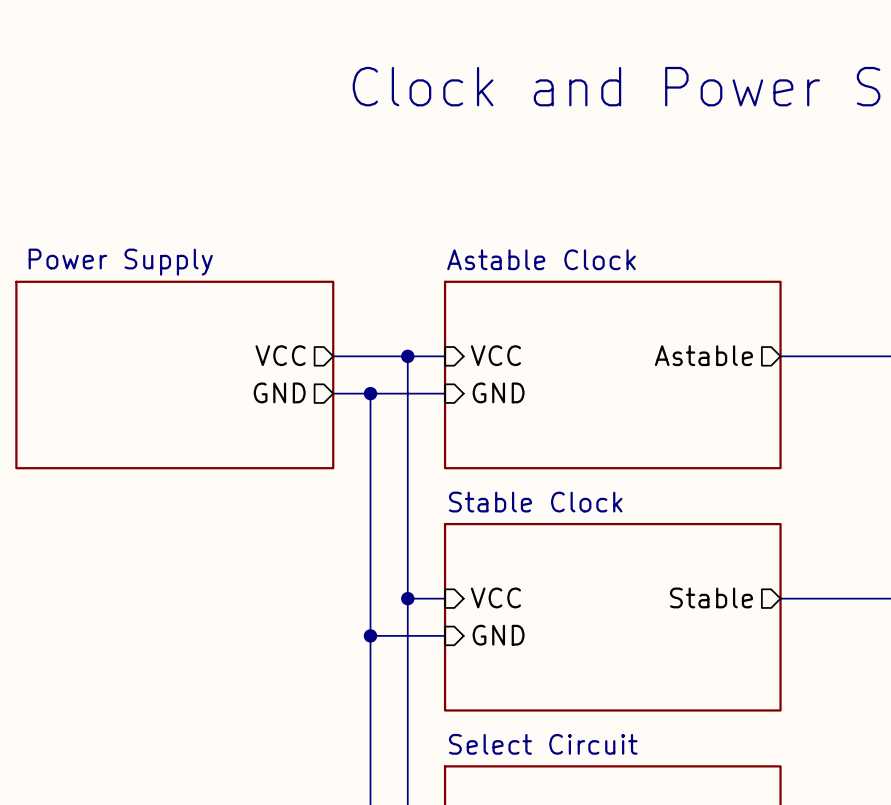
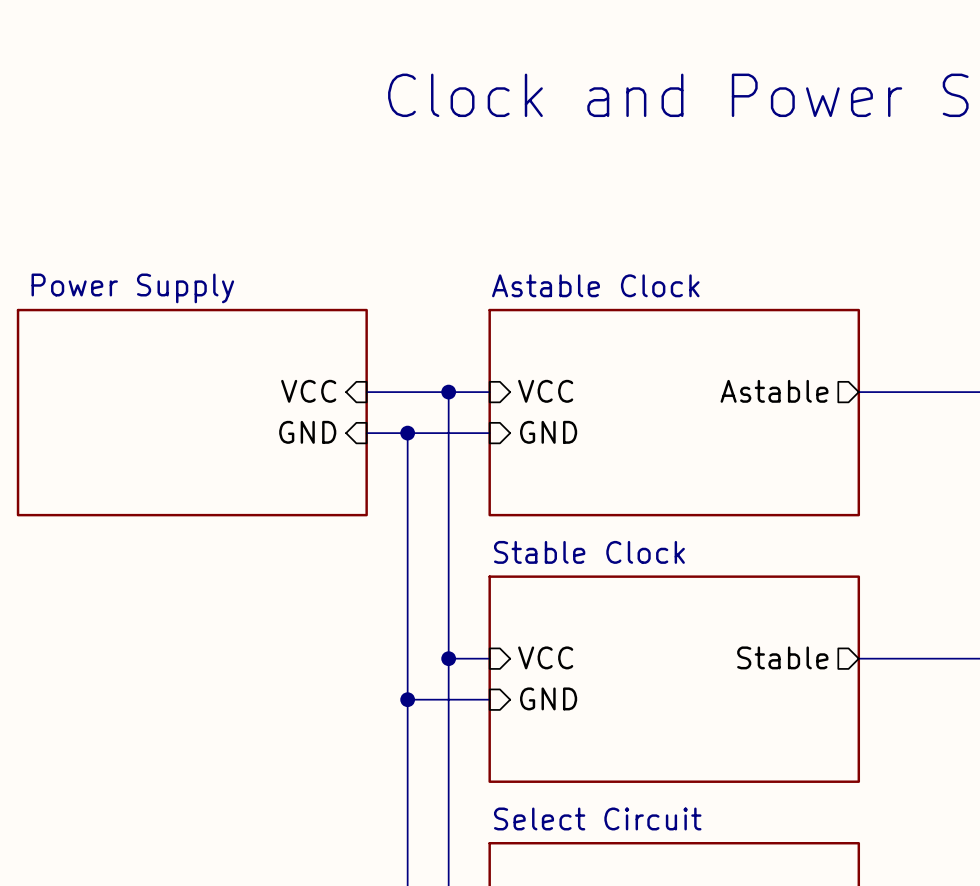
sheet pin shape: output (280, 355) -> input (308, 391)
sheet pin shape: output (279, 392) -> input (307, 432)

